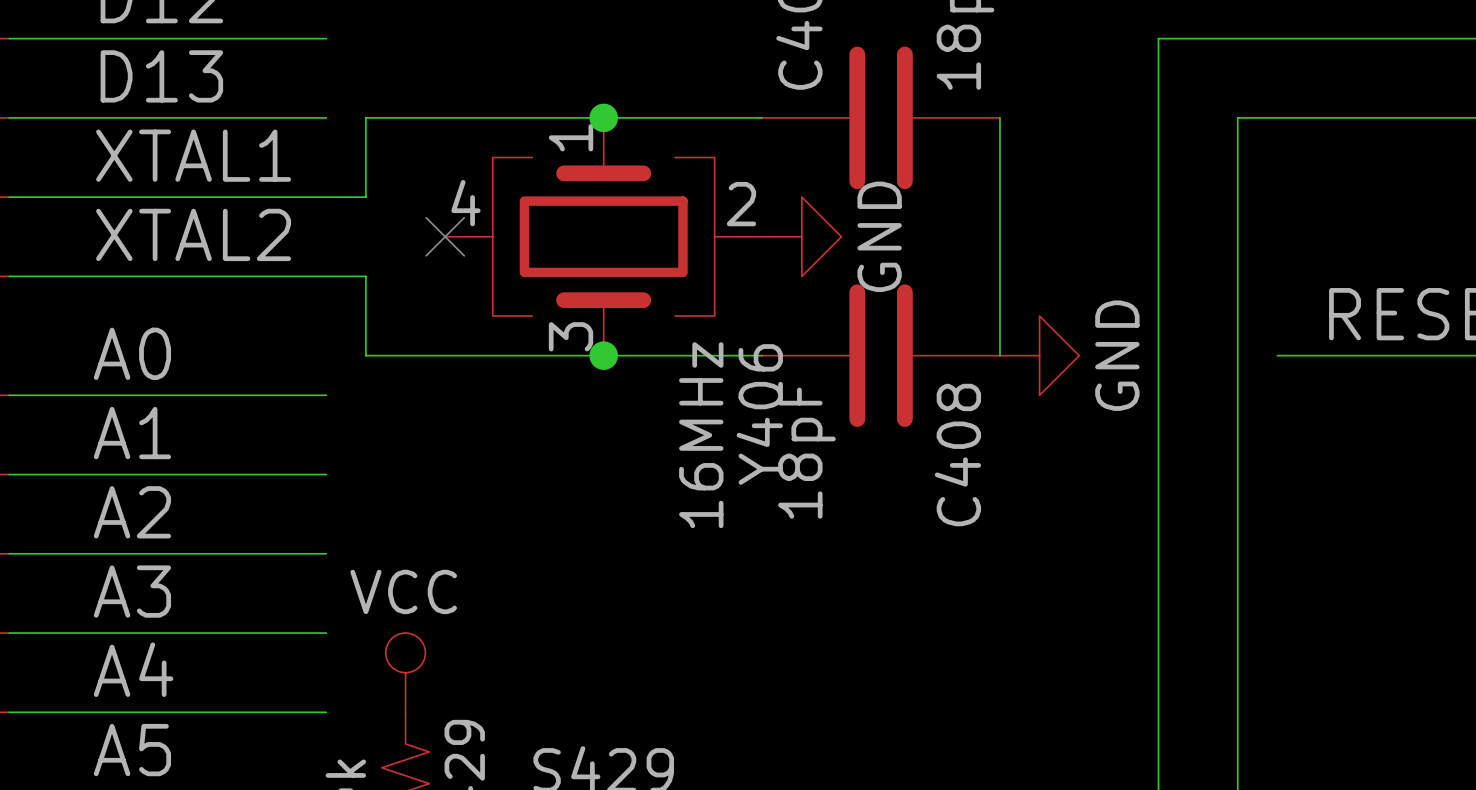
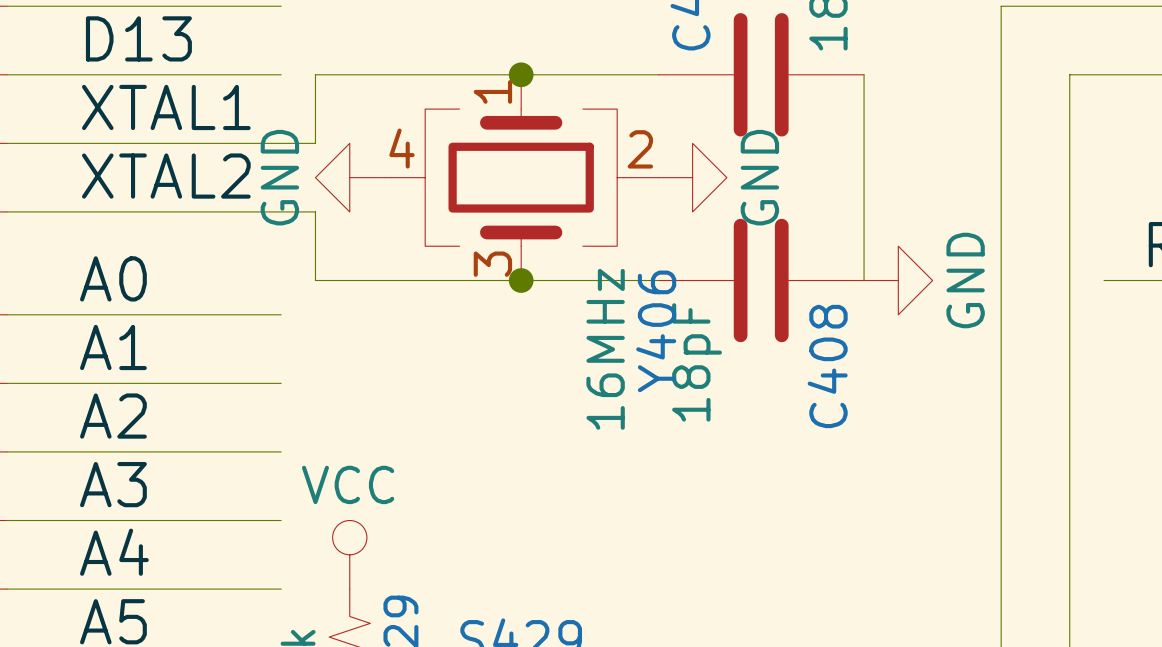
power symbol: none -> GND (349, 177)
no-connect mark: (445, 236) -> none

